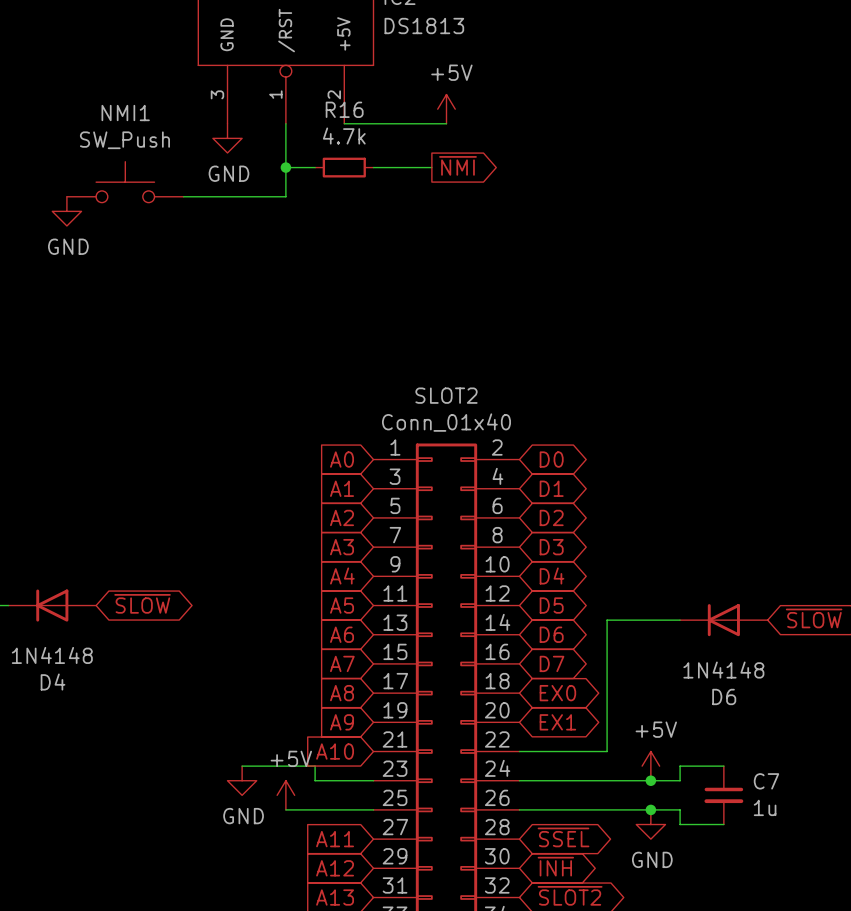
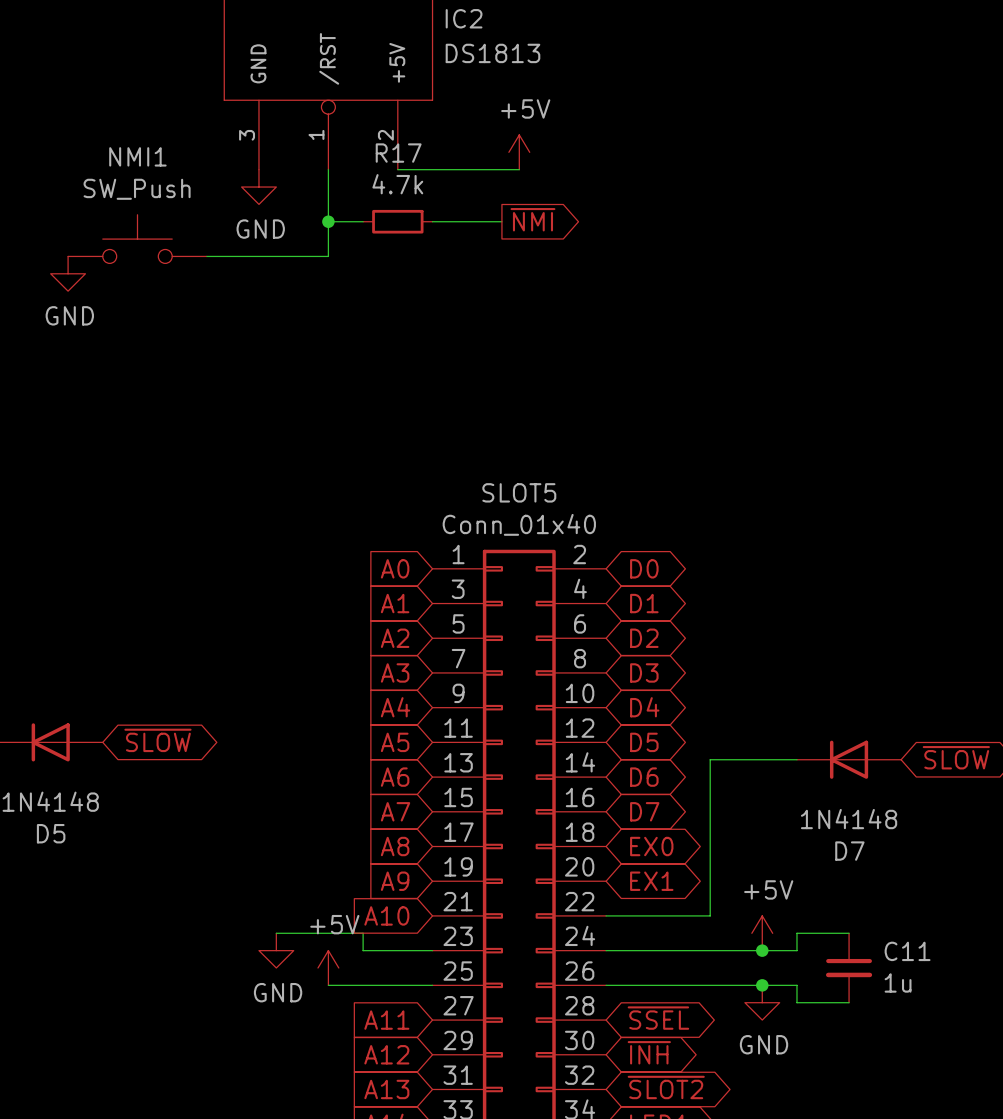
R16 name: R16 (344, 109) -> R17 (398, 153)
SLOT2 name: SLOT2 (446, 395) -> SLOT5 (519, 492)
D4 name: D4 (53, 682) -> D5 (51, 833)
D6 name: D6 (724, 696) -> D7 (849, 851)
C7 name: C7 (766, 781) -> C11 (907, 951)

